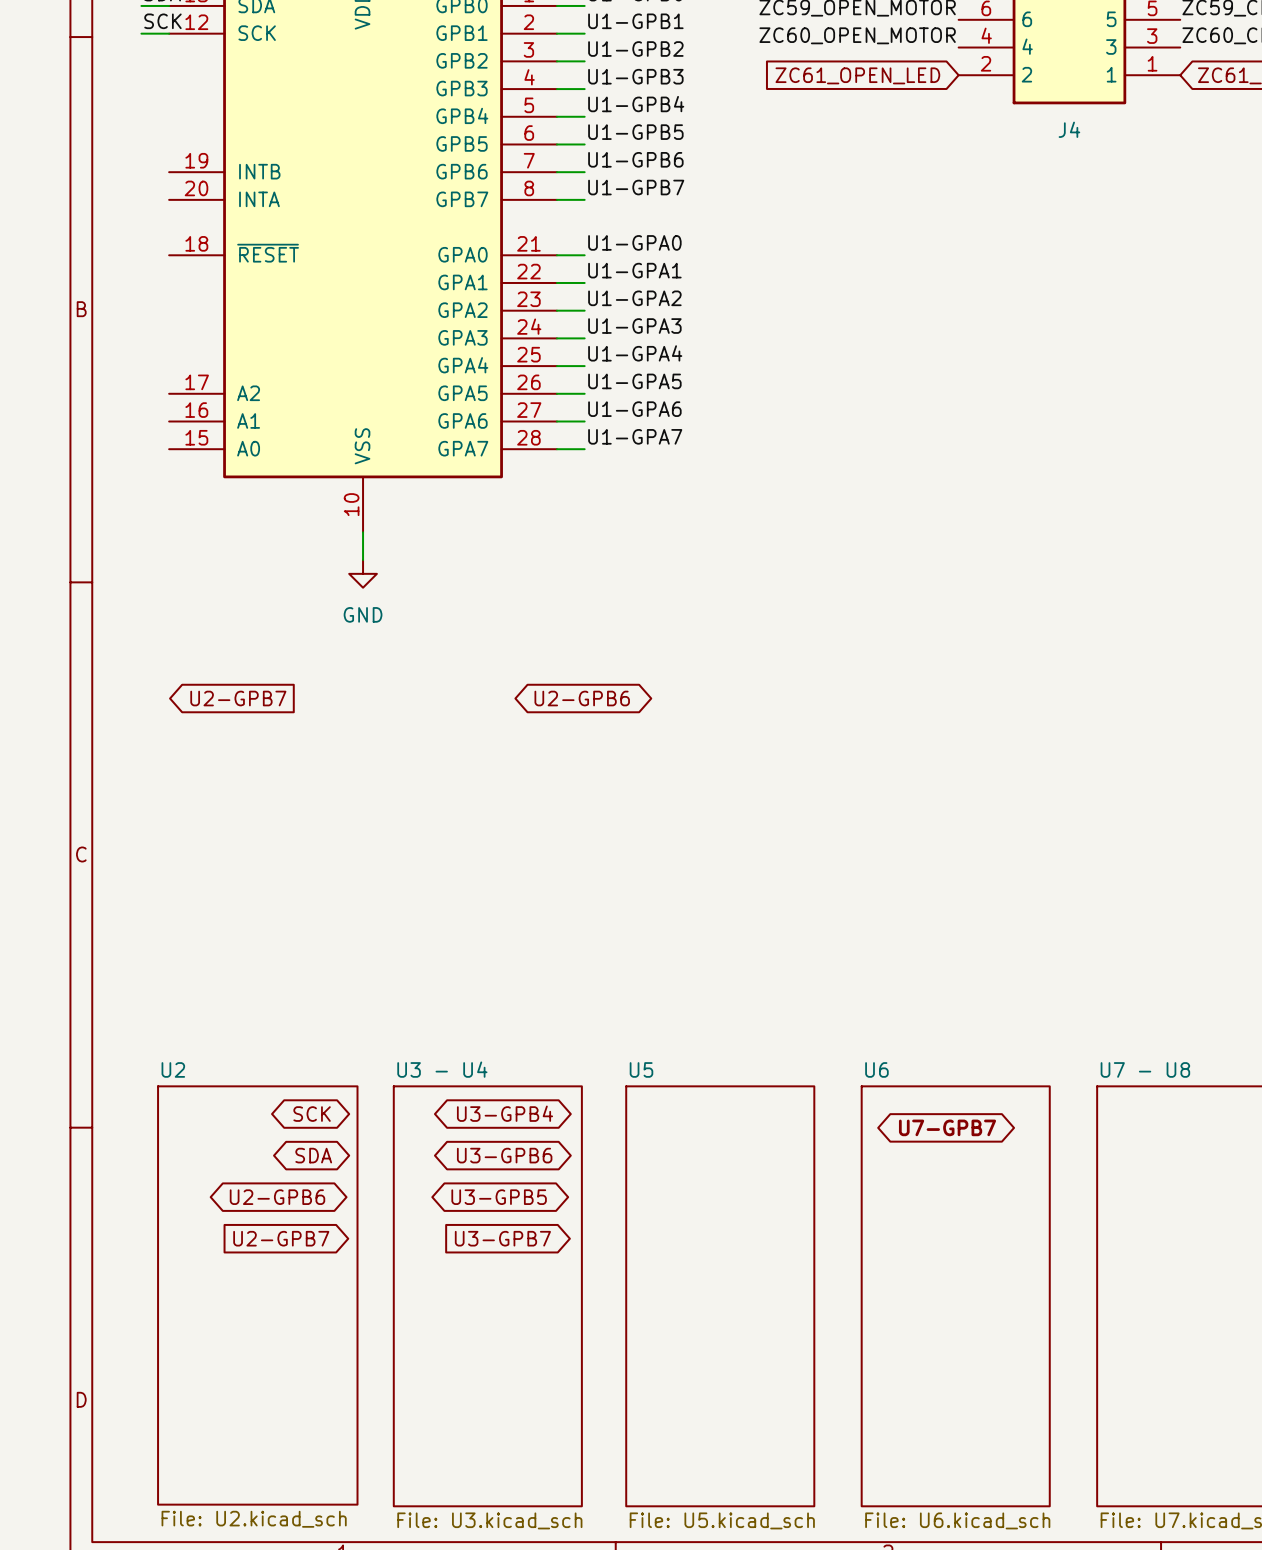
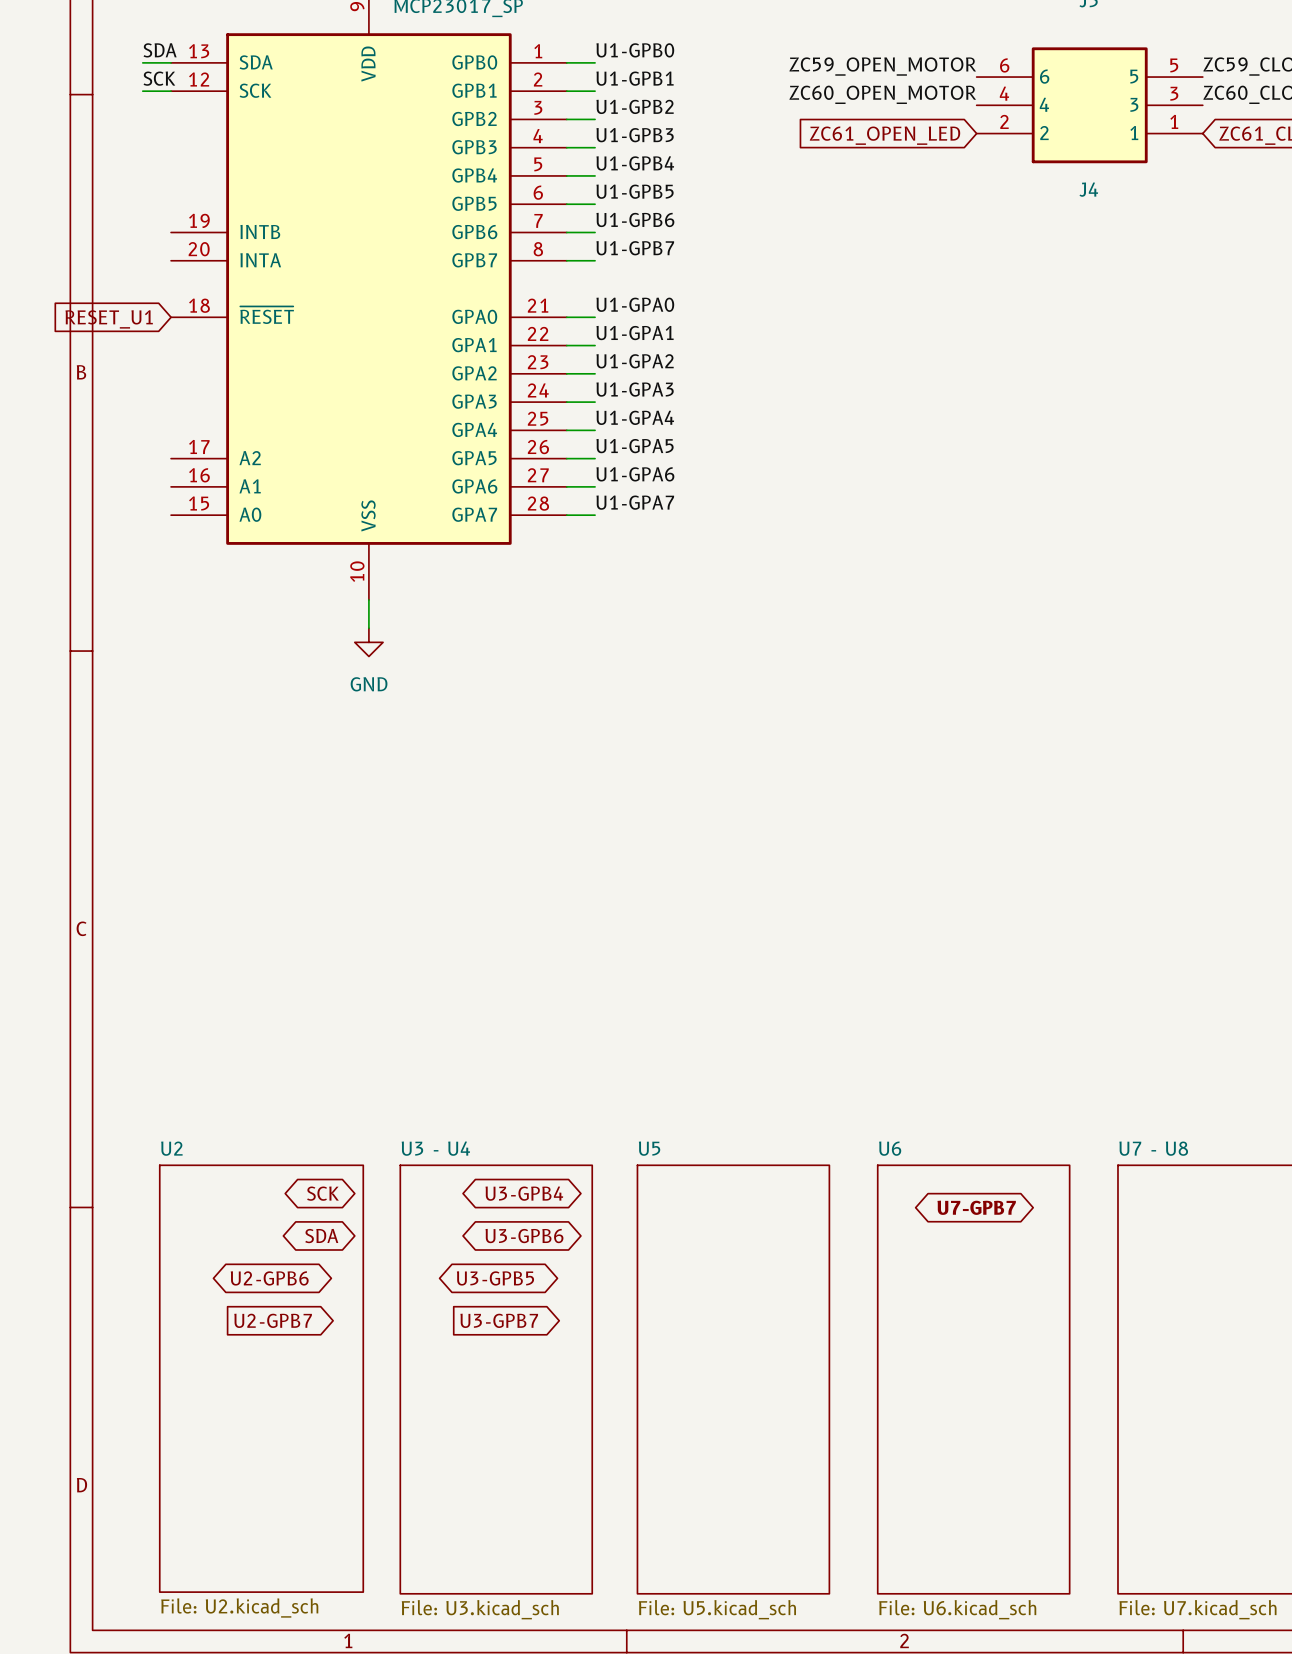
global label: none -> RESET_U1 (109, 319)
global label: U2-GPB7 (238, 698) -> none
global label: U2-GPB6 (582, 698) -> none

